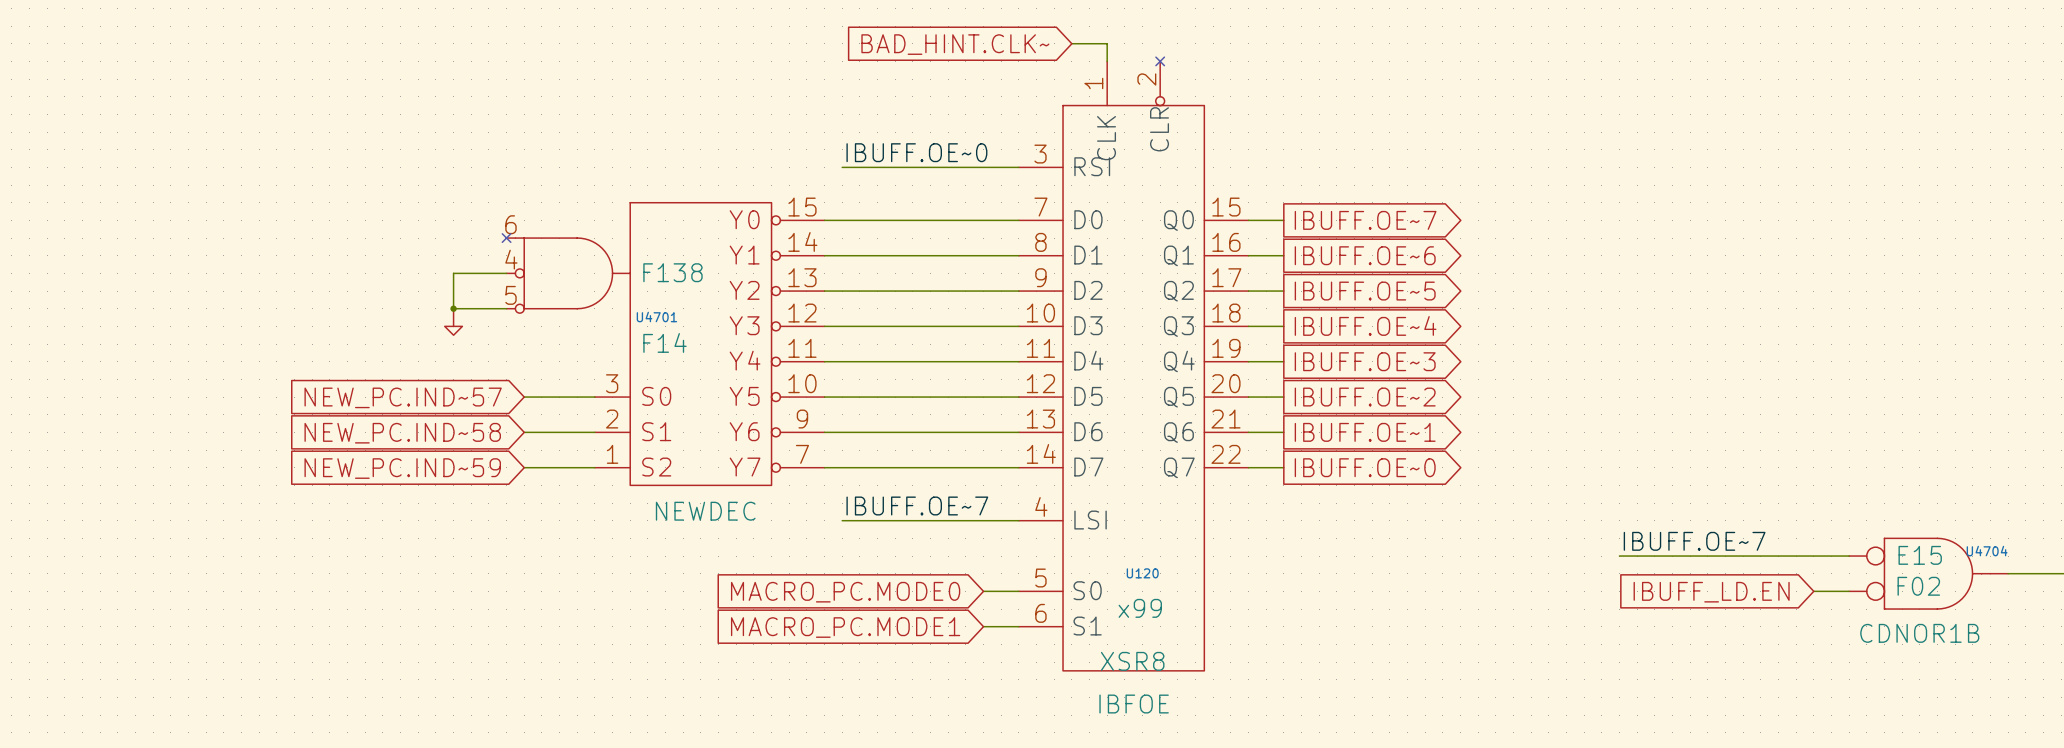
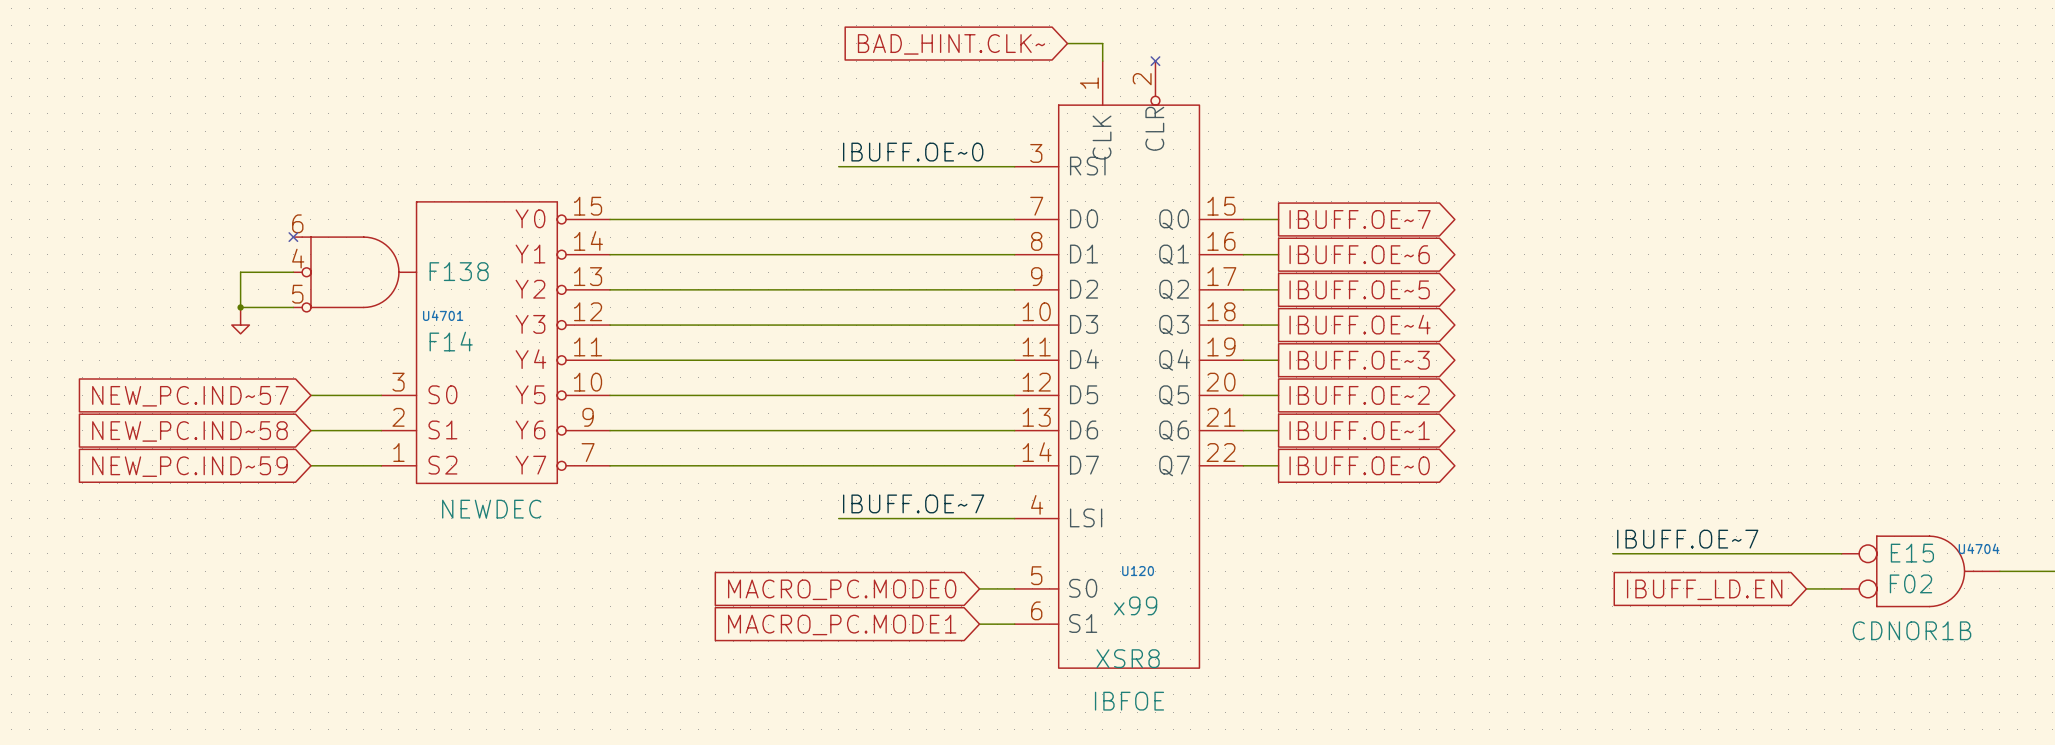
wire: none -> (610, 219) (821, 219)
no-connect mark: none -> (293, 237)
no-connect mark: (506, 238) -> none
wire: none -> (610, 254) (821, 254)
wire: none -> (293, 272) (240, 272) (240, 307) (293, 307)
wire: (506, 273) (453, 273) (453, 308) (506, 308) -> none
wire: none -> (610, 289) (821, 289)
junction: none -> (240, 307)
junction: (453, 308) -> none
power symbol: none -> (240, 320)
power symbol: (453, 322) -> none
wire: none -> (610, 325) (821, 325)
U4701 position: (665, 344) -> (451, 342)
wire: none -> (610, 360) (821, 360)
global label: none -> NEW_PC.IND~57 (190, 396)
wire: none -> (310, 395) (381, 395)
global label: NEW_PC.IND~57 (403, 397) -> none
wire: (524, 397) (594, 397) -> none
wire: none -> (610, 395) (821, 395)
wire: none -> (310, 430) (381, 430)
wire: (524, 432) (594, 432) -> none
wire: none -> (610, 430) (821, 430)
global label: none -> NEW_PC.IND~58 (189, 431)
global label: NEW_PC.IND~58 (402, 433) -> none
wire: none -> (310, 465) (381, 465)
wire: (524, 467) (594, 467) -> none
wire: none -> (610, 465) (821, 465)
global label: none -> NEW_PC.IND~59 (189, 466)
global label: NEW_PC.IND~59 (402, 468) -> none

